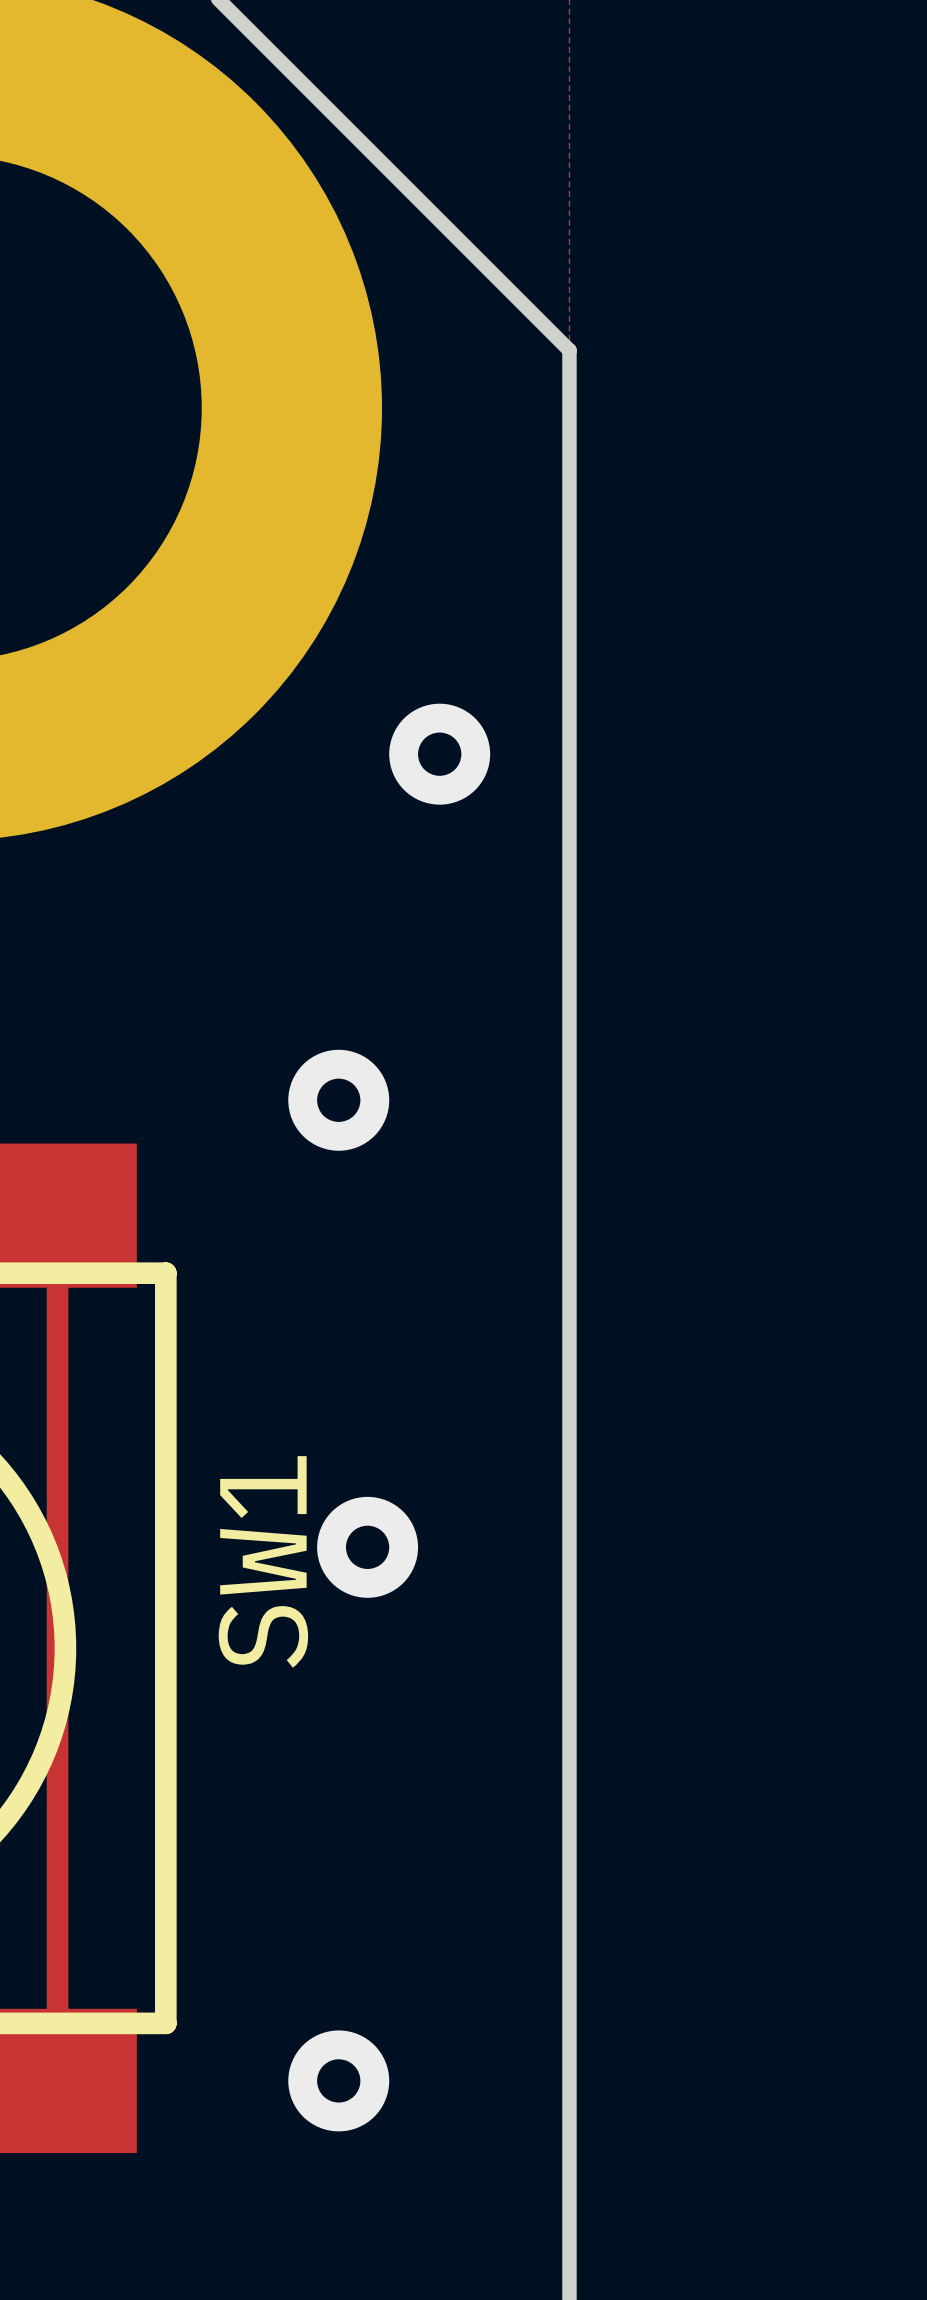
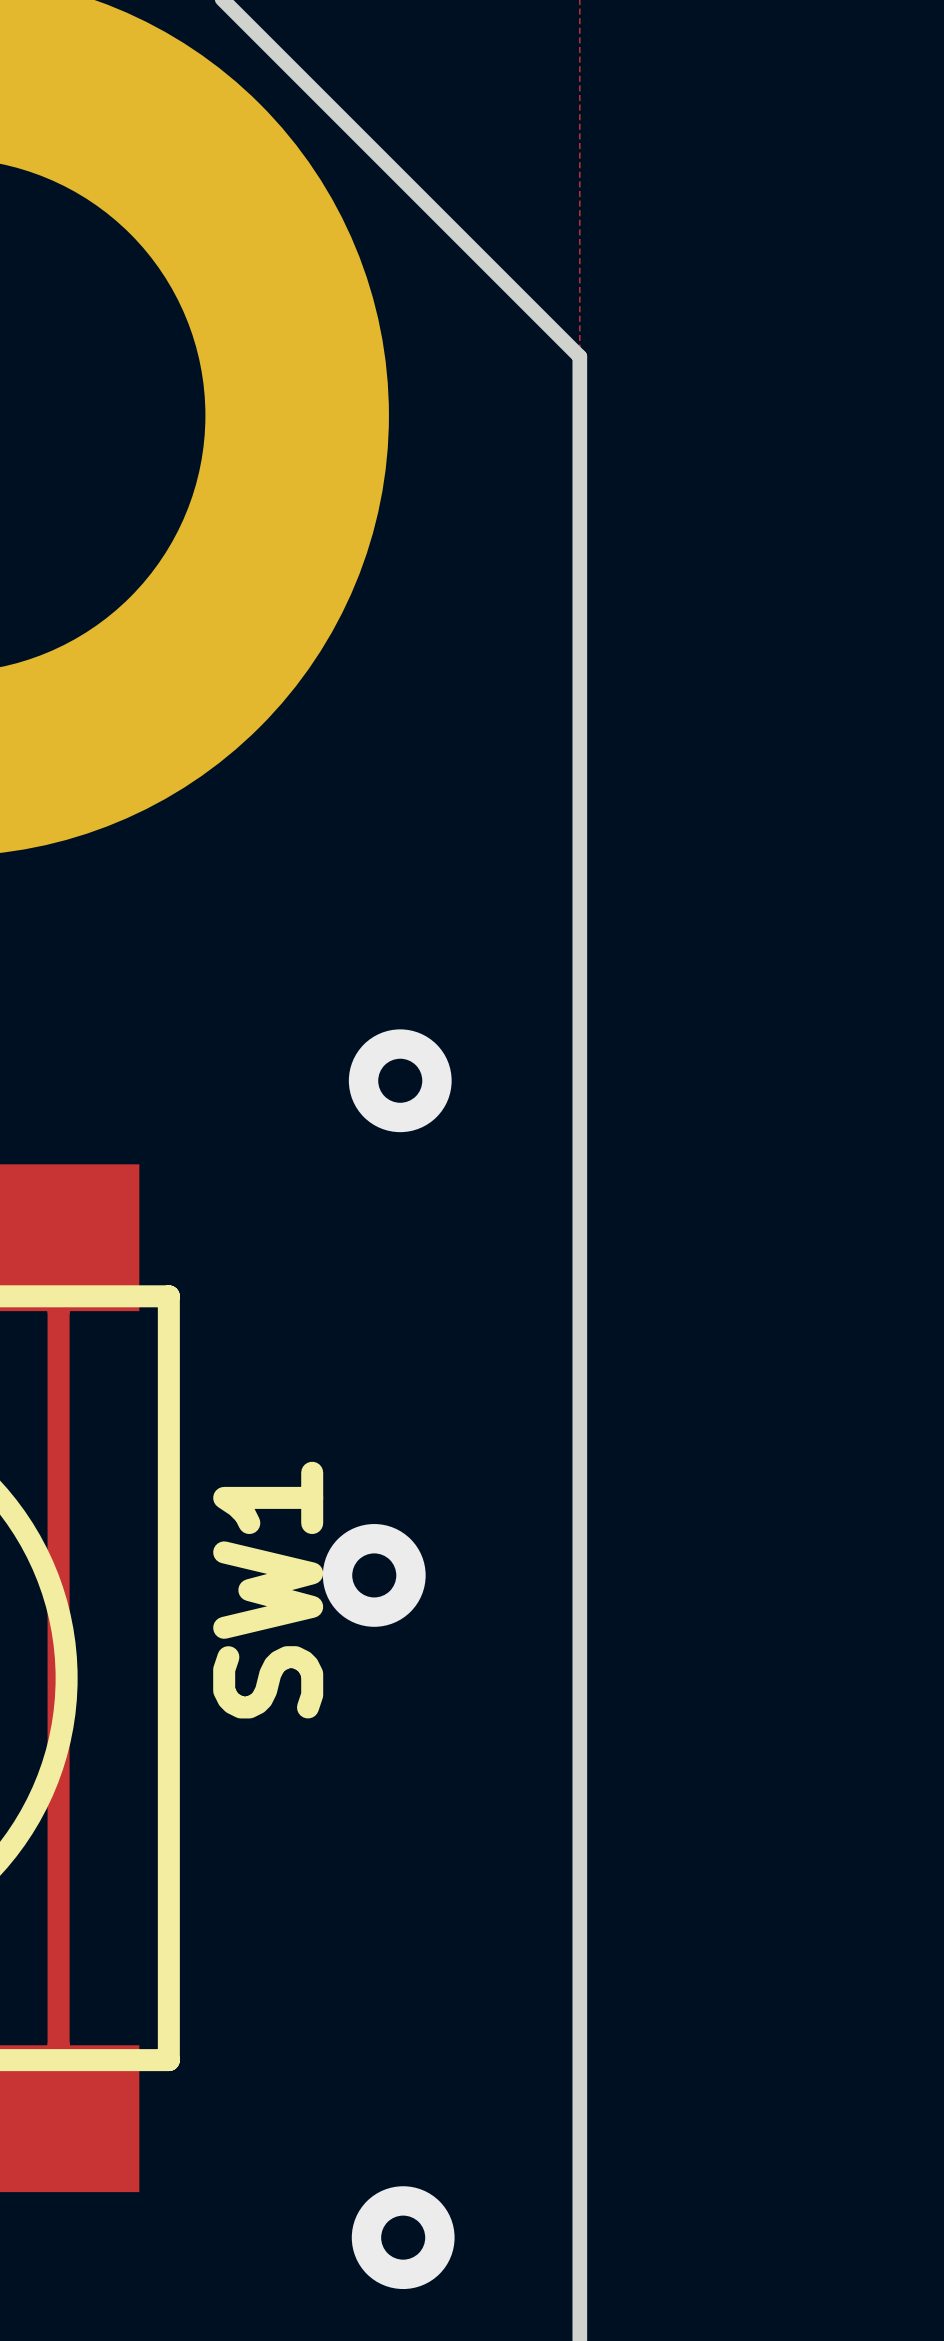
via: (439, 754) -> none
via position: (338, 1100) -> (400, 1080)
via position: (338, 2080) -> (403, 2237)

